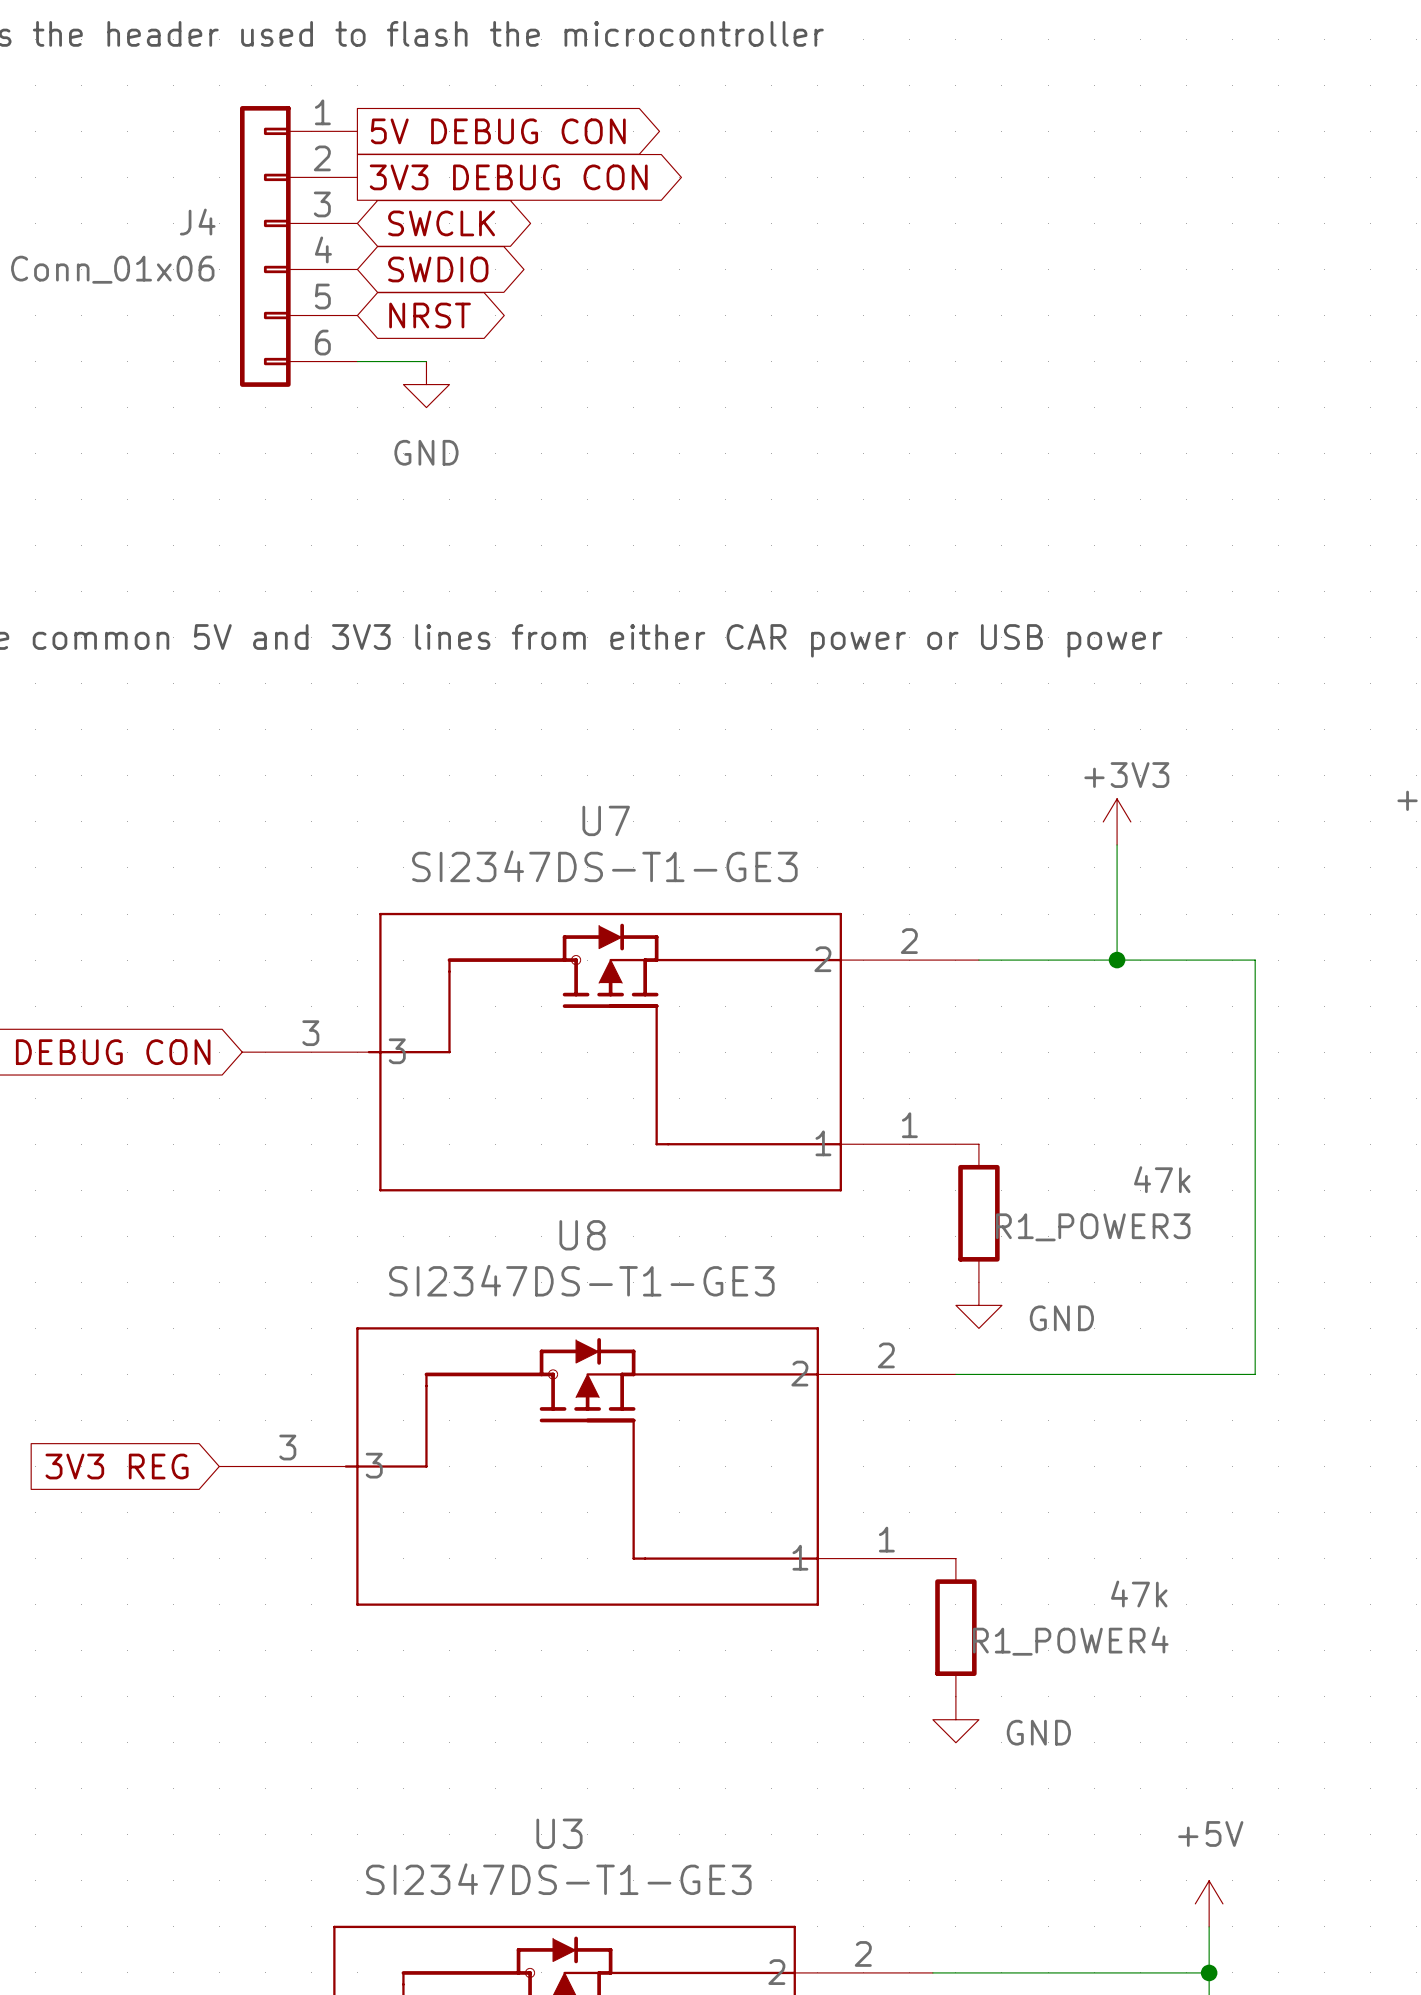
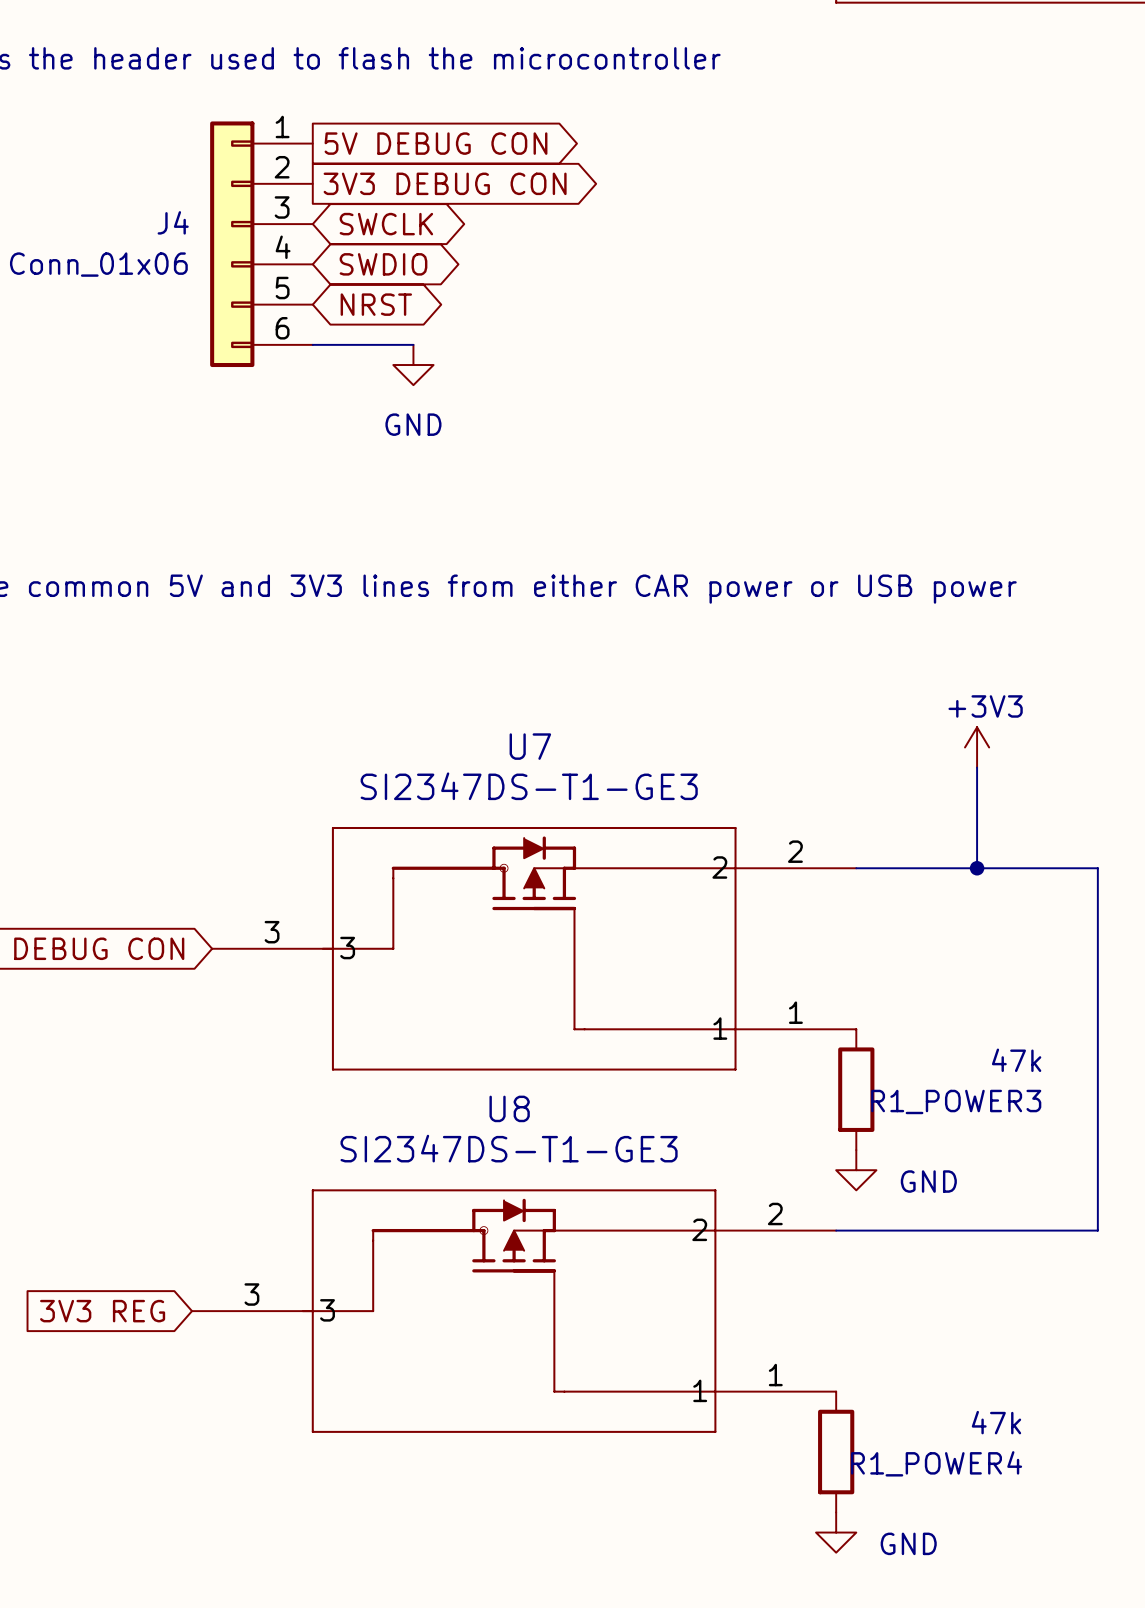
wire: none -> (373, 344) (413, 344)
power symbol position: GND (426, 384) -> GND (413, 365)

